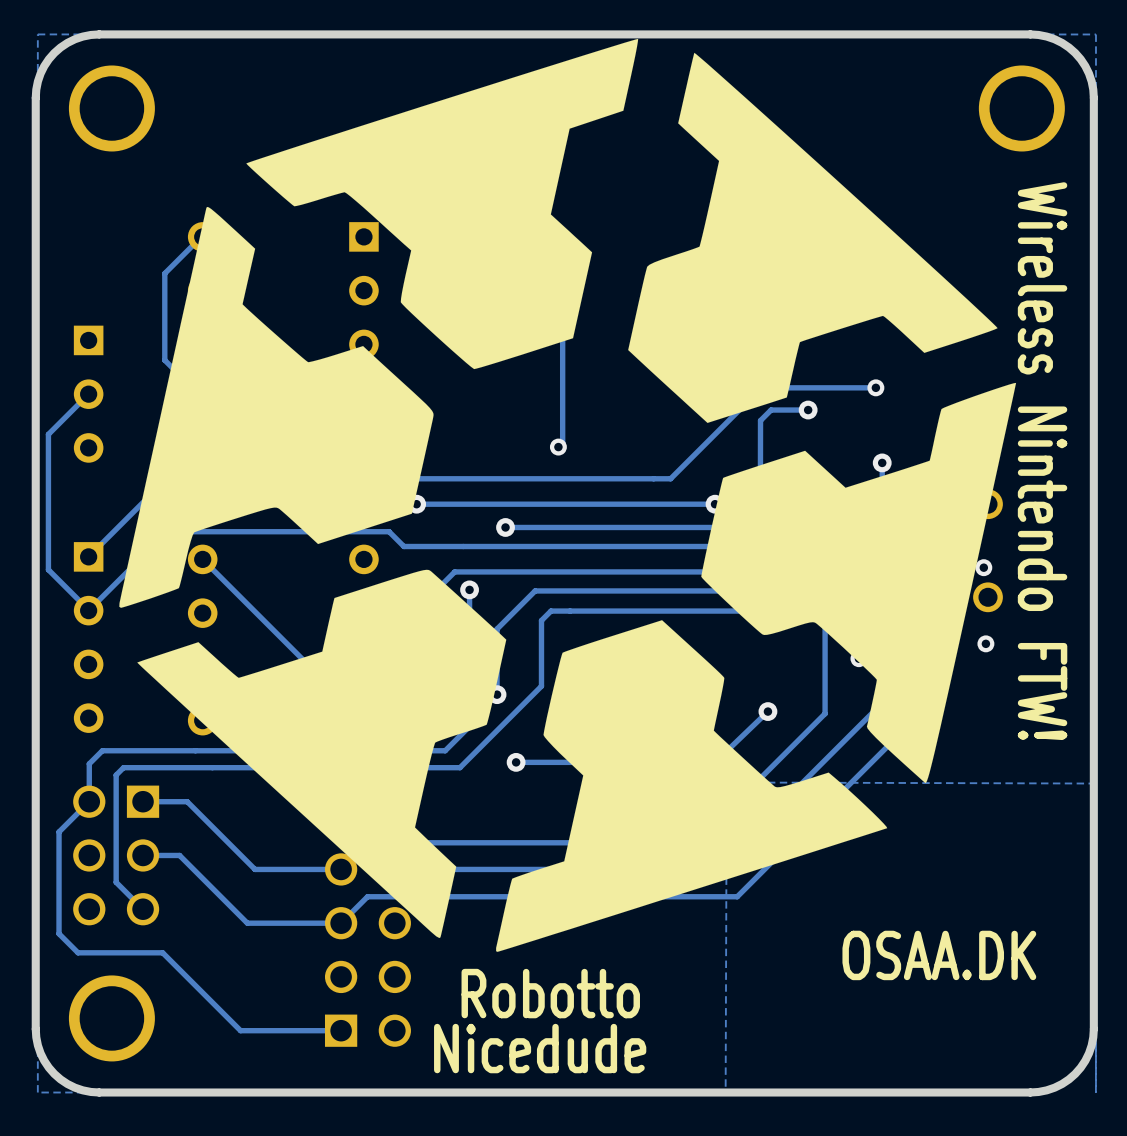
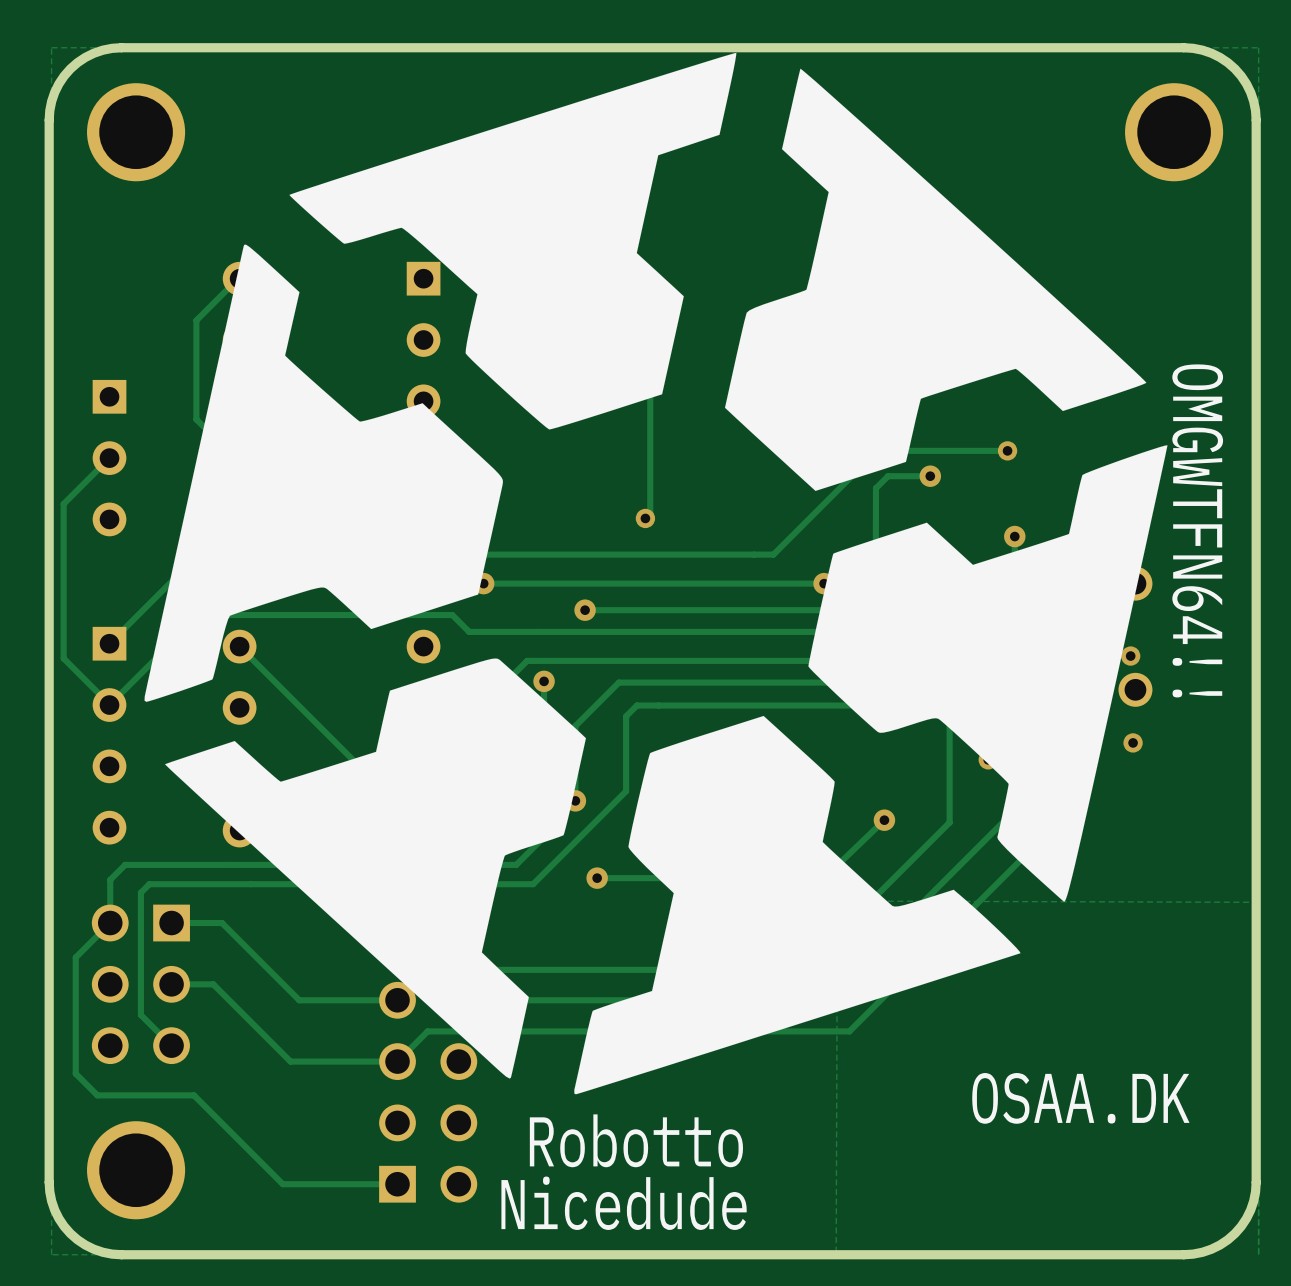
text: Wireless Nintendo FTW! (1042, 461) -> OMGWTFN64!! (1197, 530)

